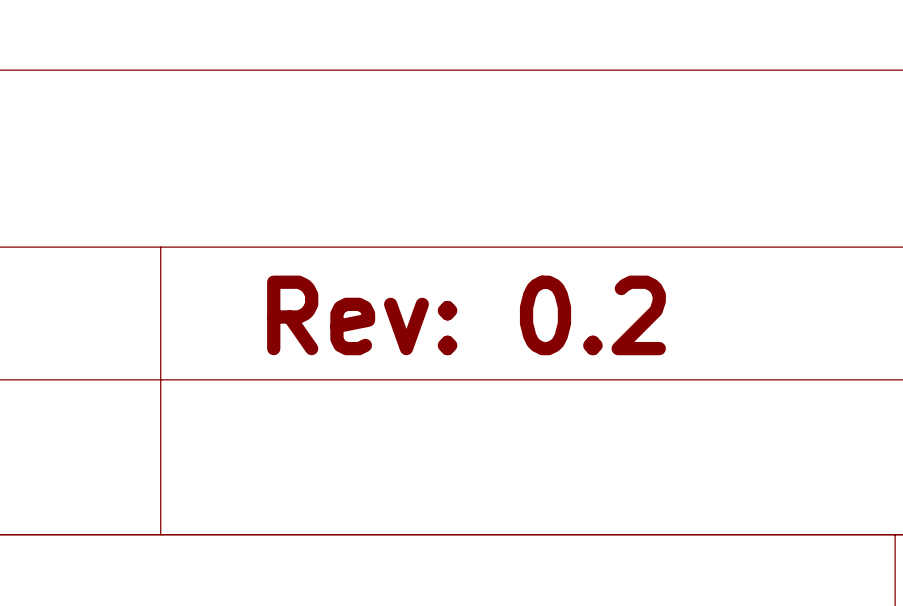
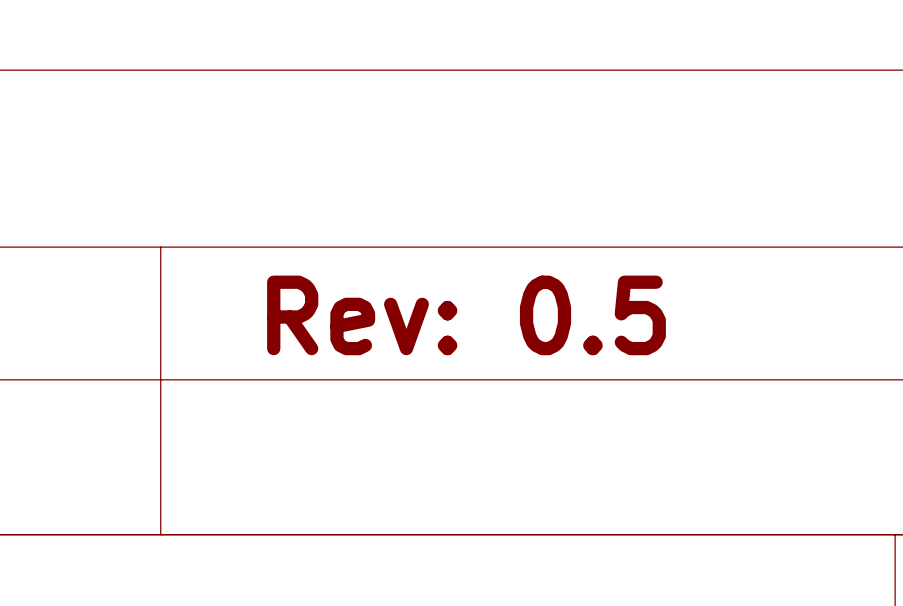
title block: Rev: 0.2 (466, 315) -> Rev: 0.5 (466, 315)

